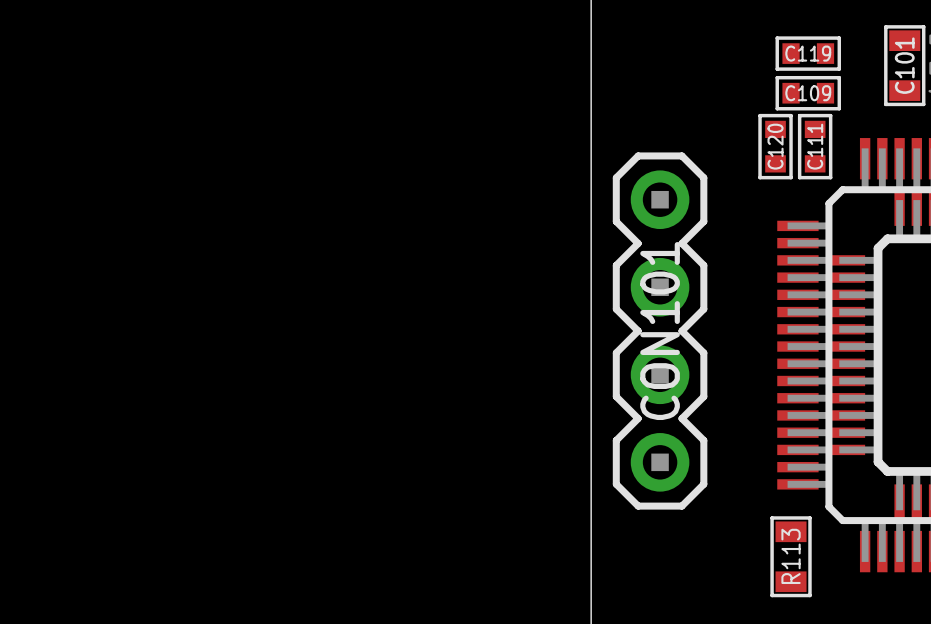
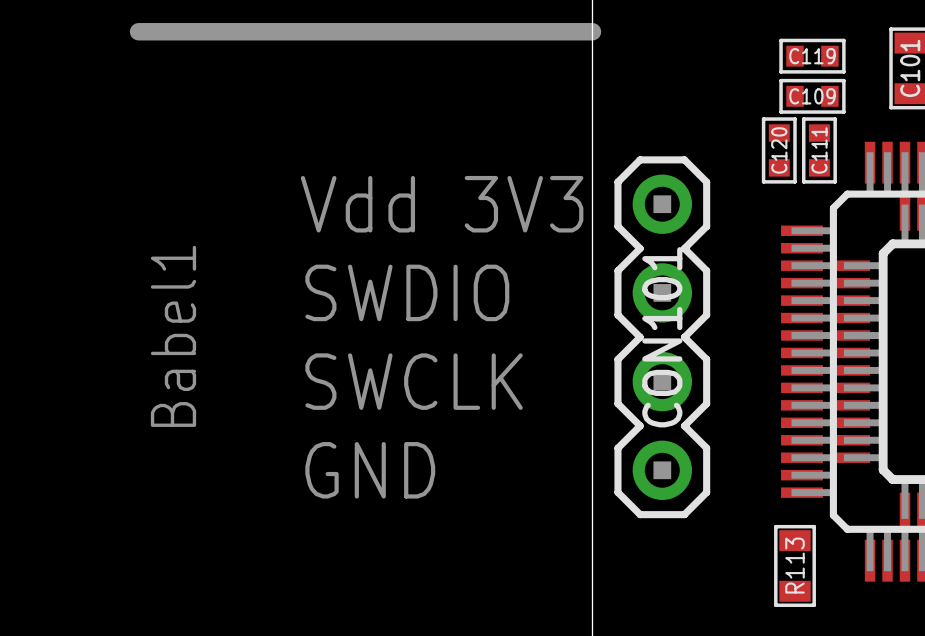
line: none -> (138, 31) (592, 31)
text: none -> Vdd 3V3 (442, 204)
text: none -> SWDIO (407, 292)
text: none -> Babel1 (173, 336)
text: none -> SWCLK (414, 381)
text: none -> GND (370, 470)

